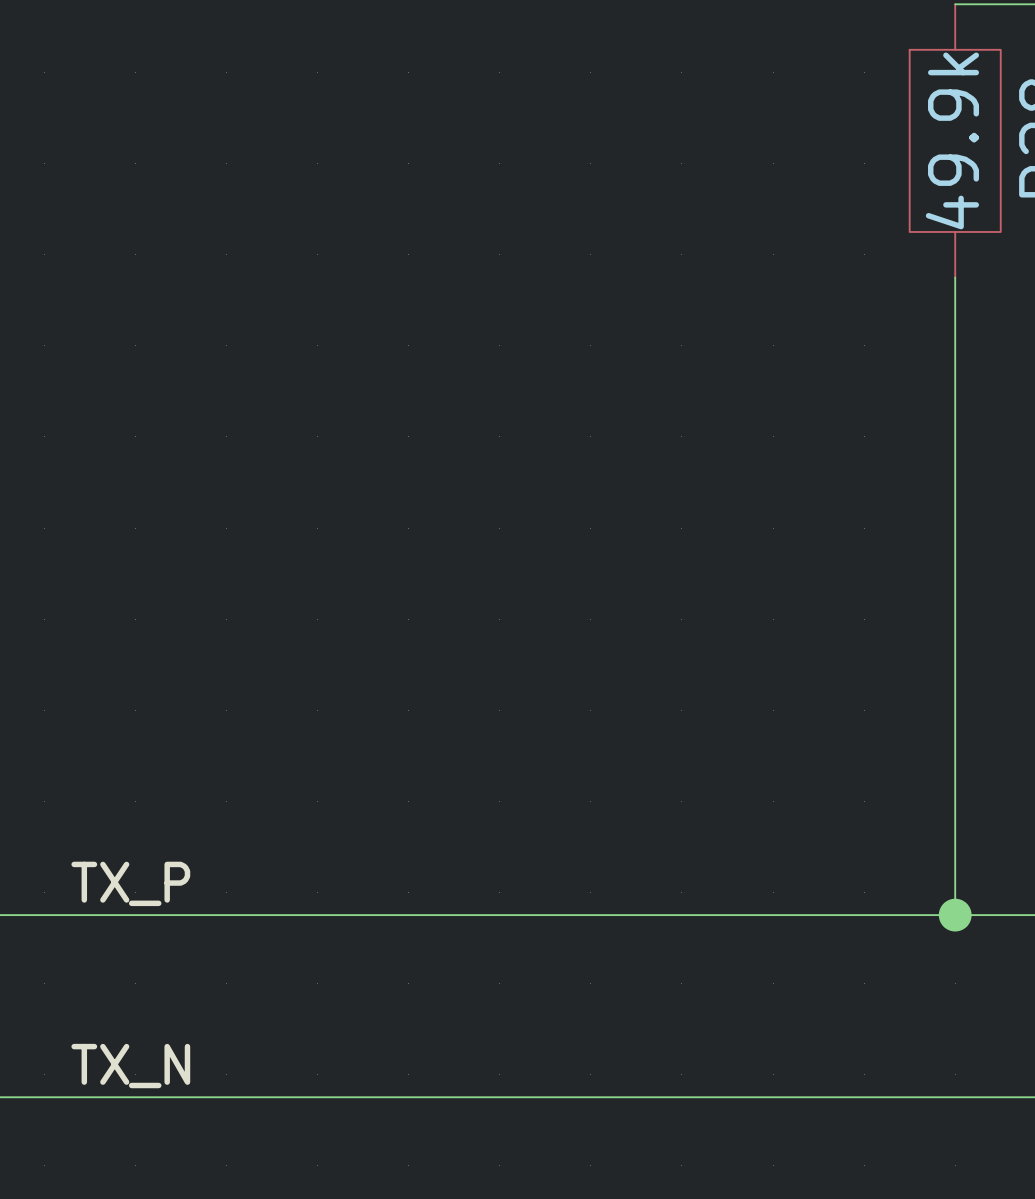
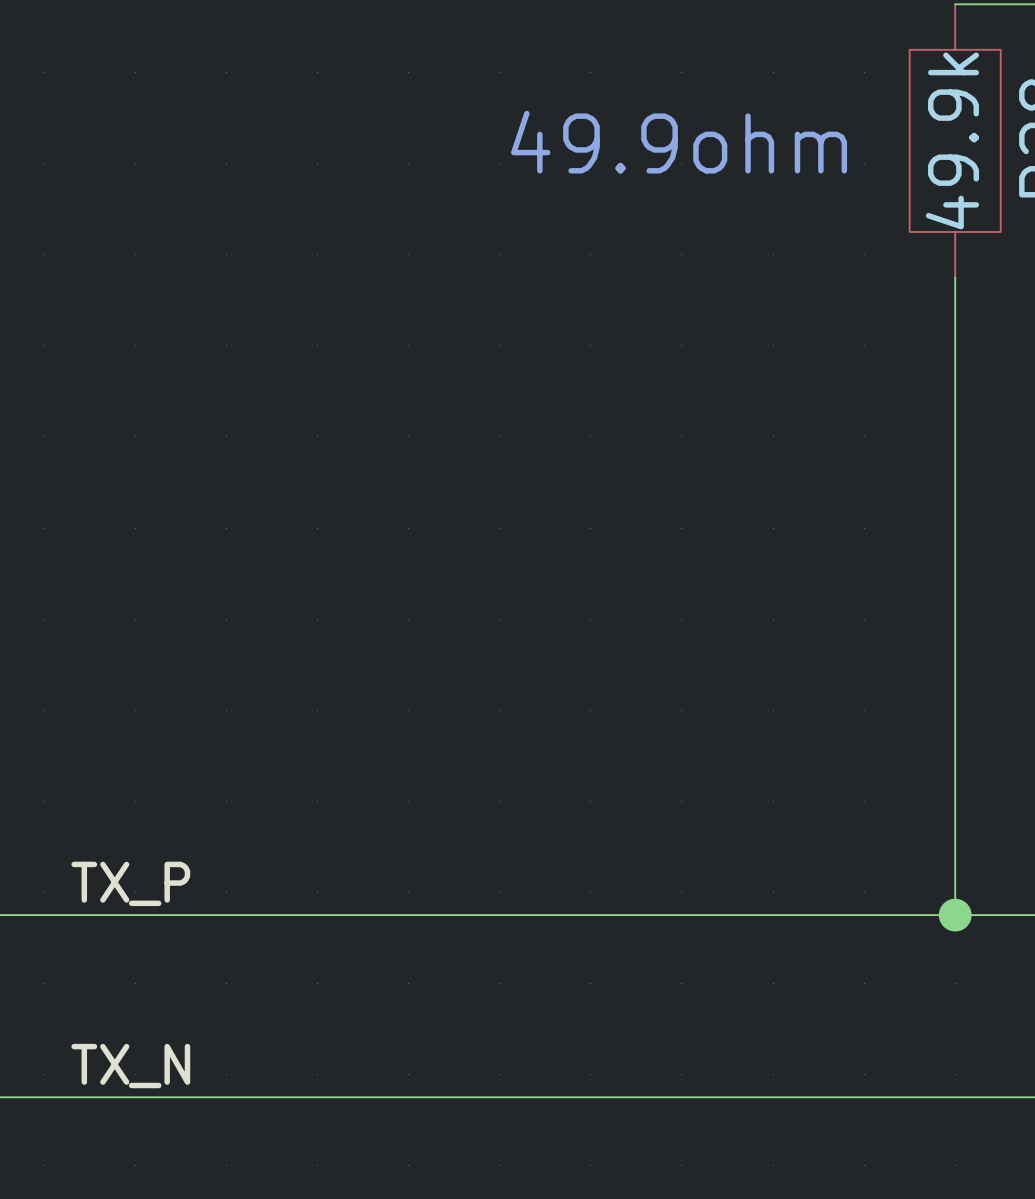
text: none -> 49.9ohm (679, 142)

